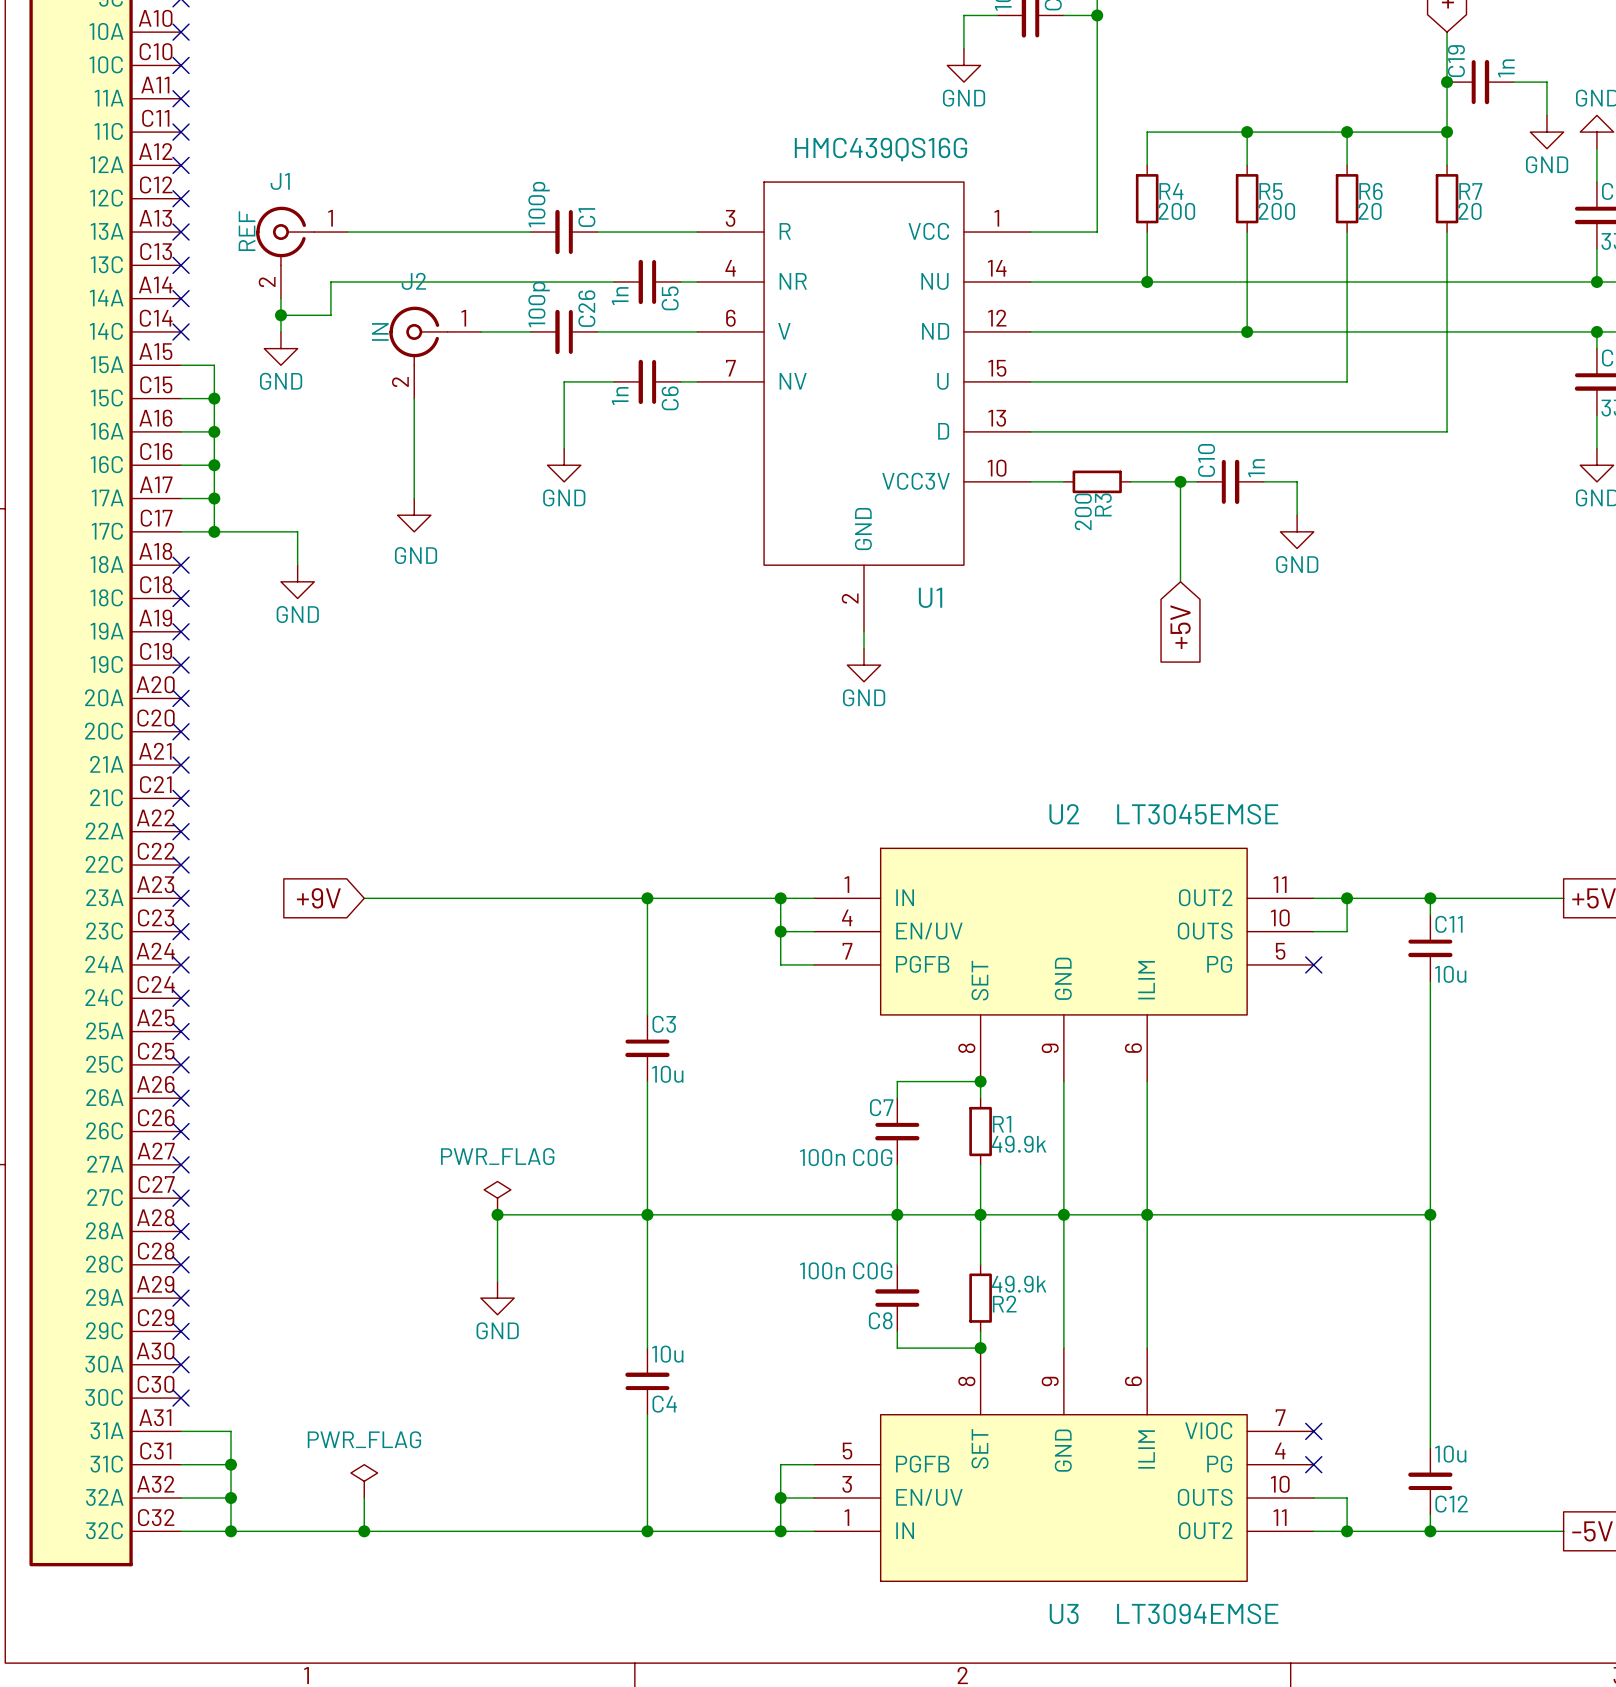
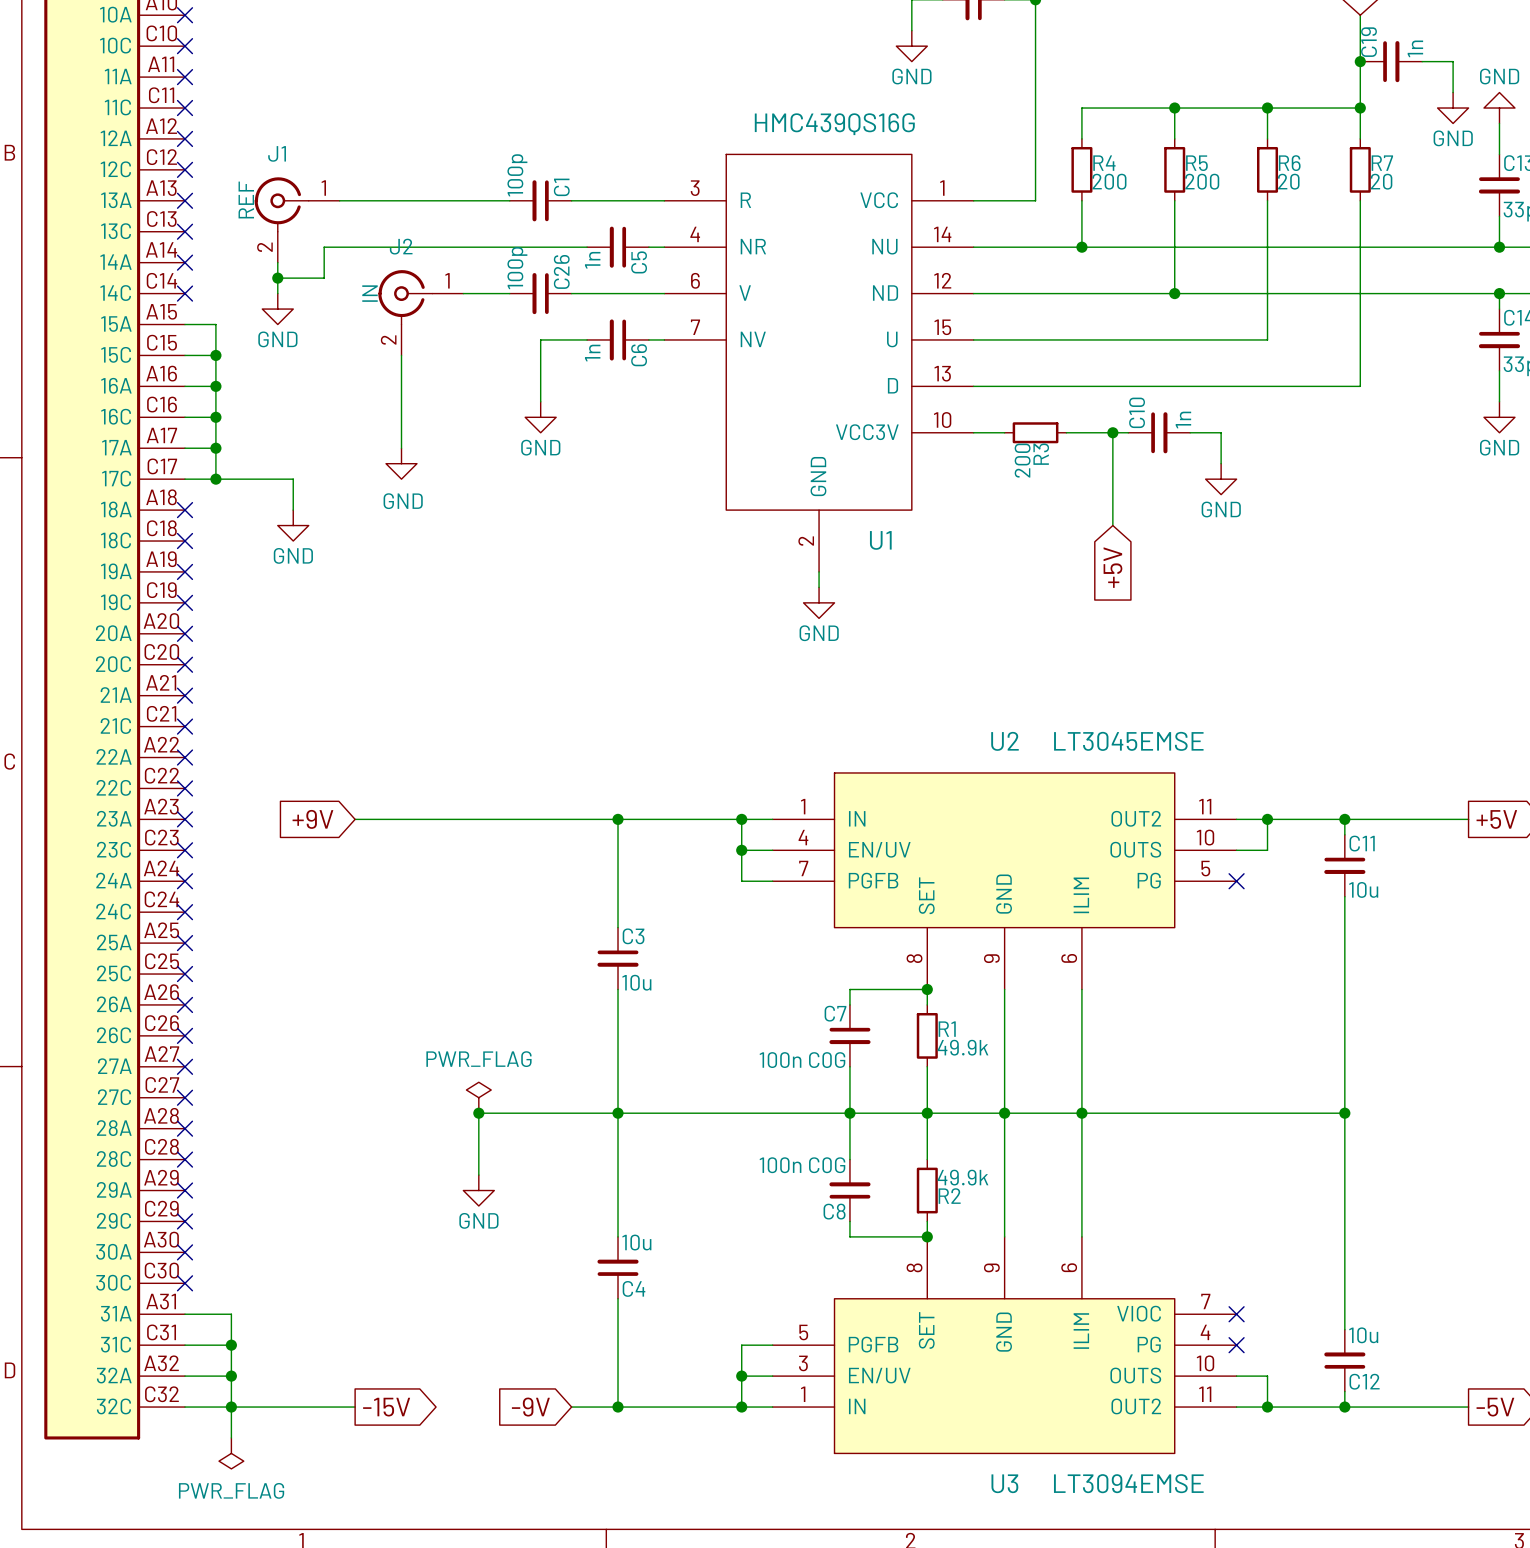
power symbol rotation: 0° (364, 1481) -> 180° (231, 1453)
power symbol position: PWR_FLAG (364, 1481) -> PWR_FLAG (231, 1453)
wire: (364, 1498) (364, 1531) (597, 1531) -> none
wire: none -> (231, 1407) (231, 1437)
junction: (364, 1531) -> none
global label: none -> -15V (386, 1407)
global label: none -> -9V (530, 1407)

